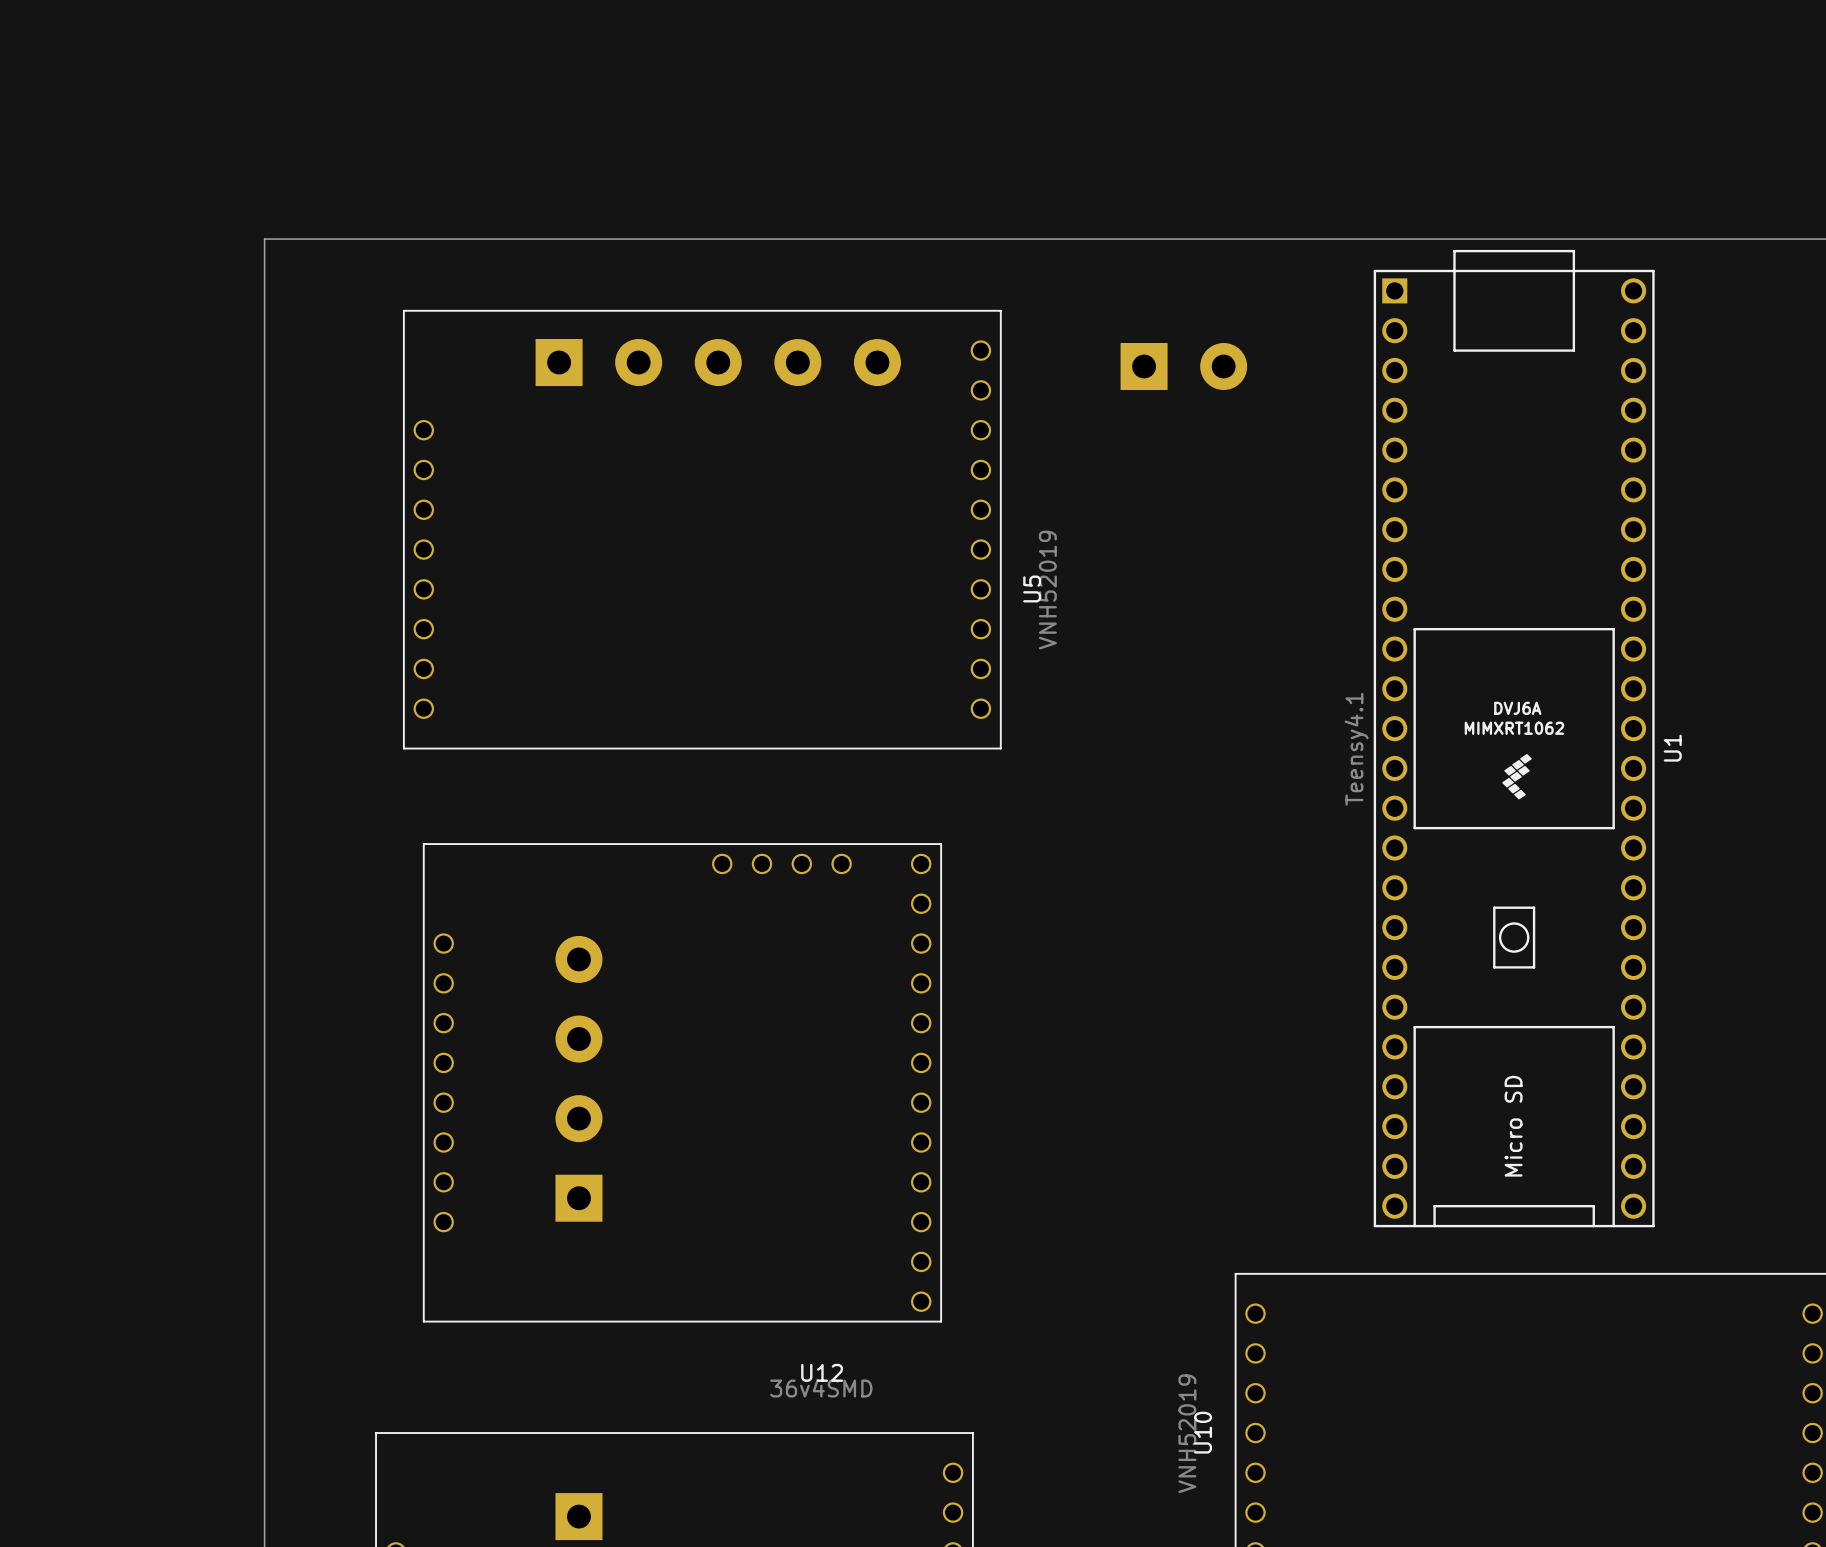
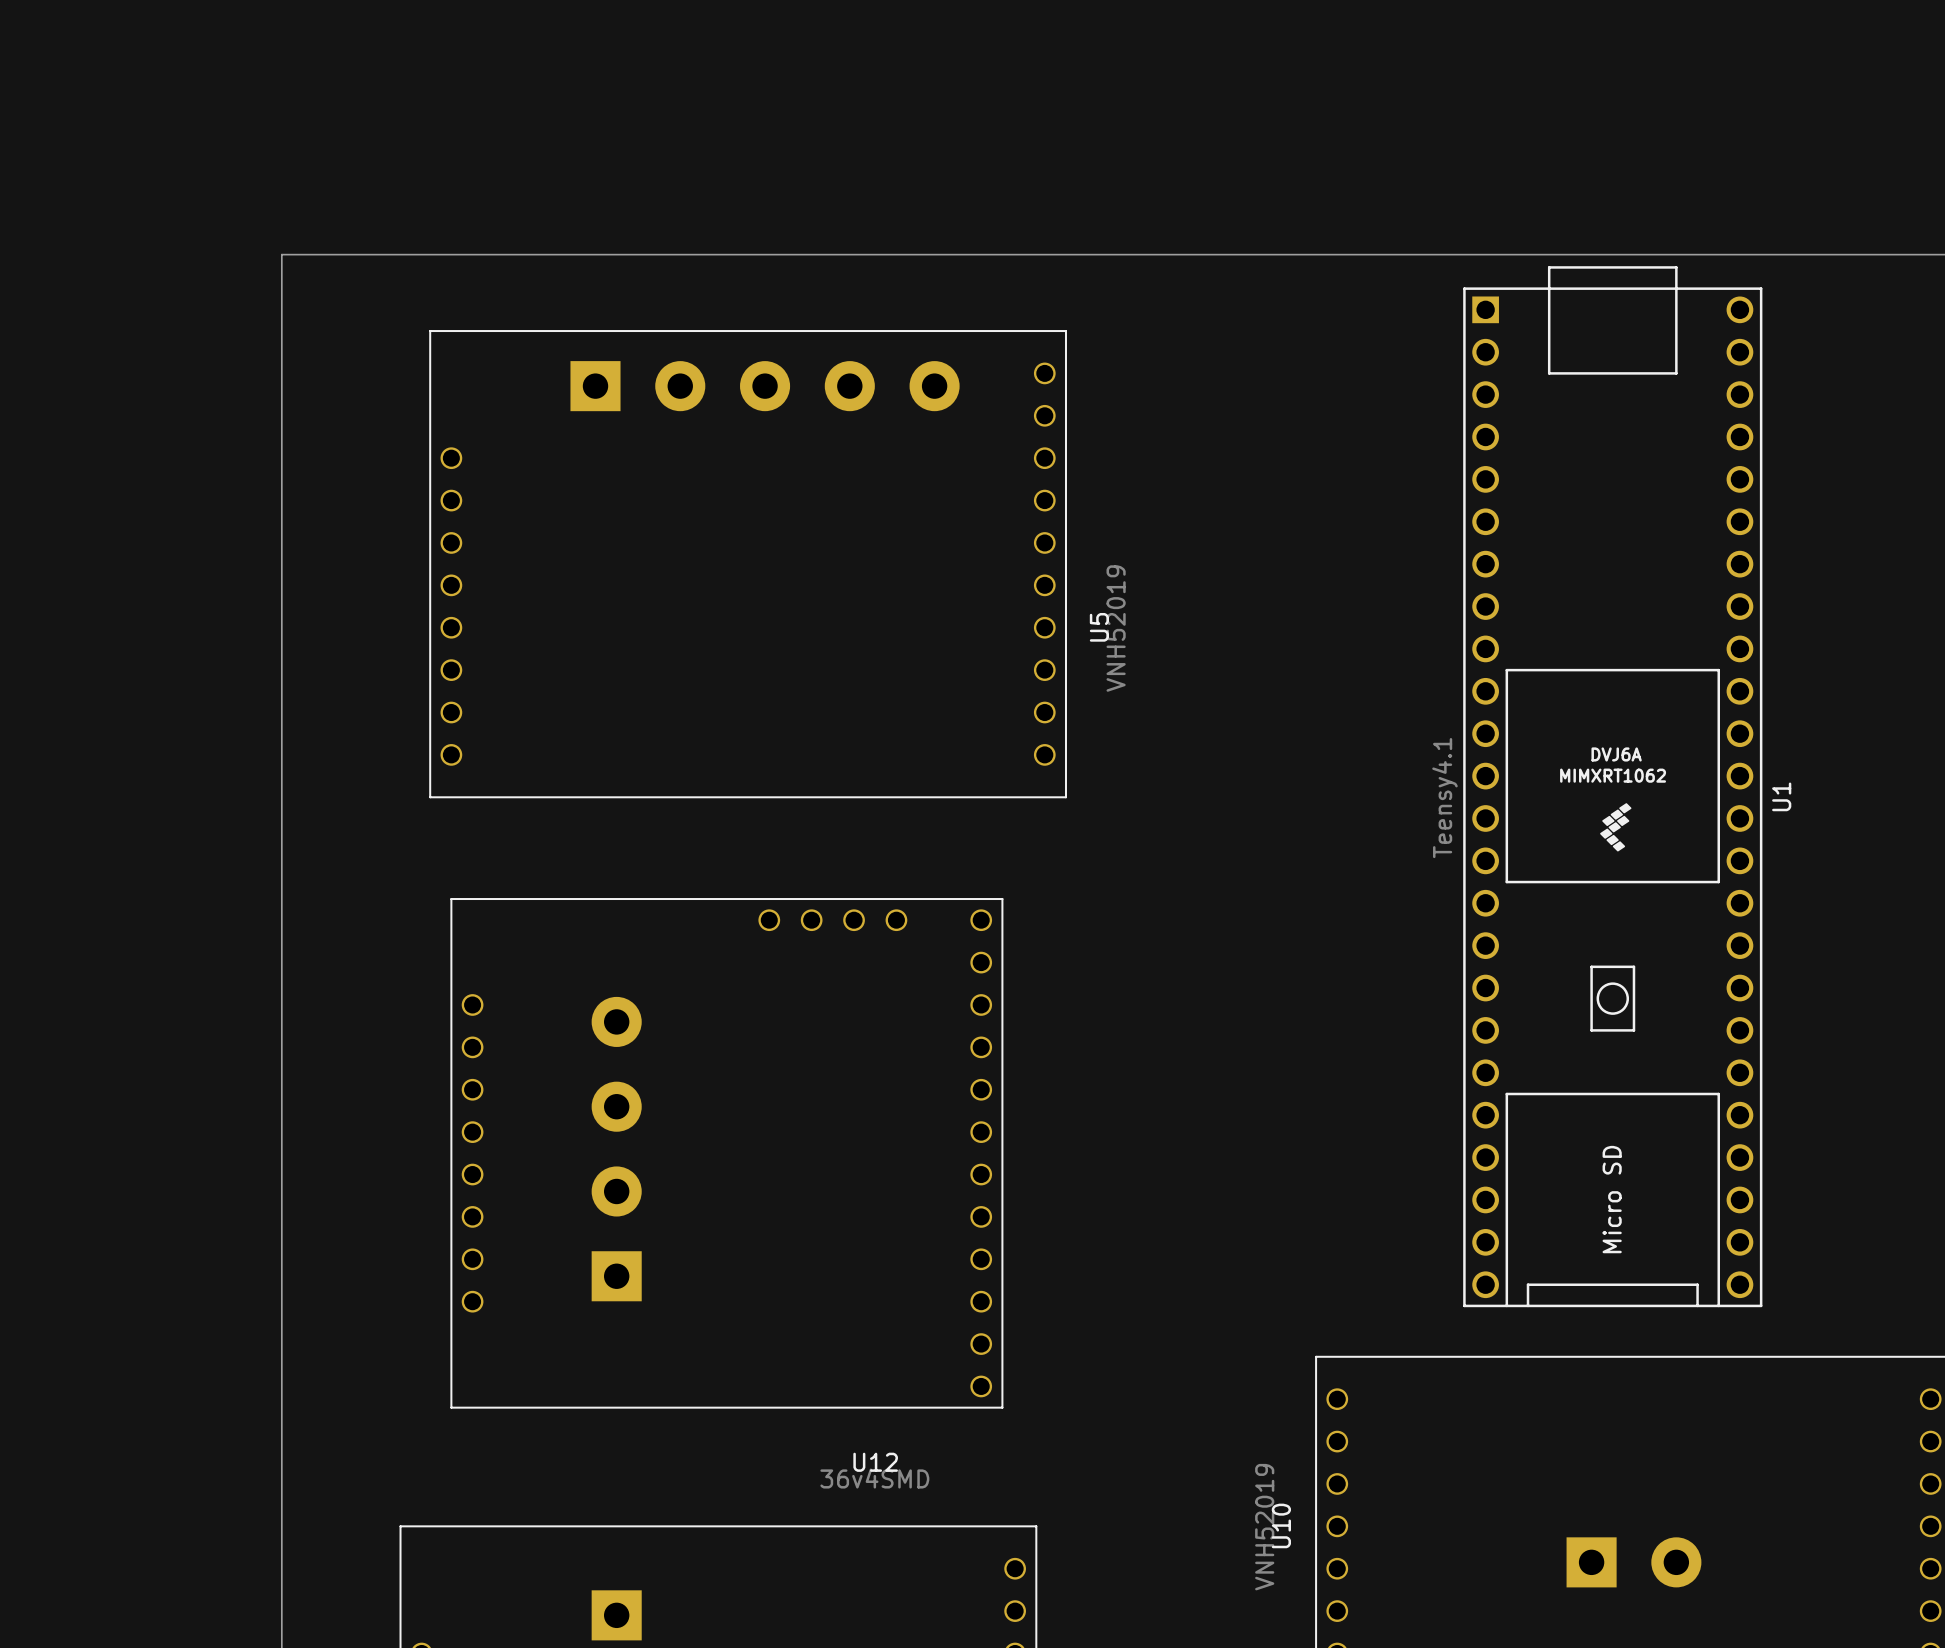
part: (1183, 366) -> none
part: none -> (1633, 1562)

